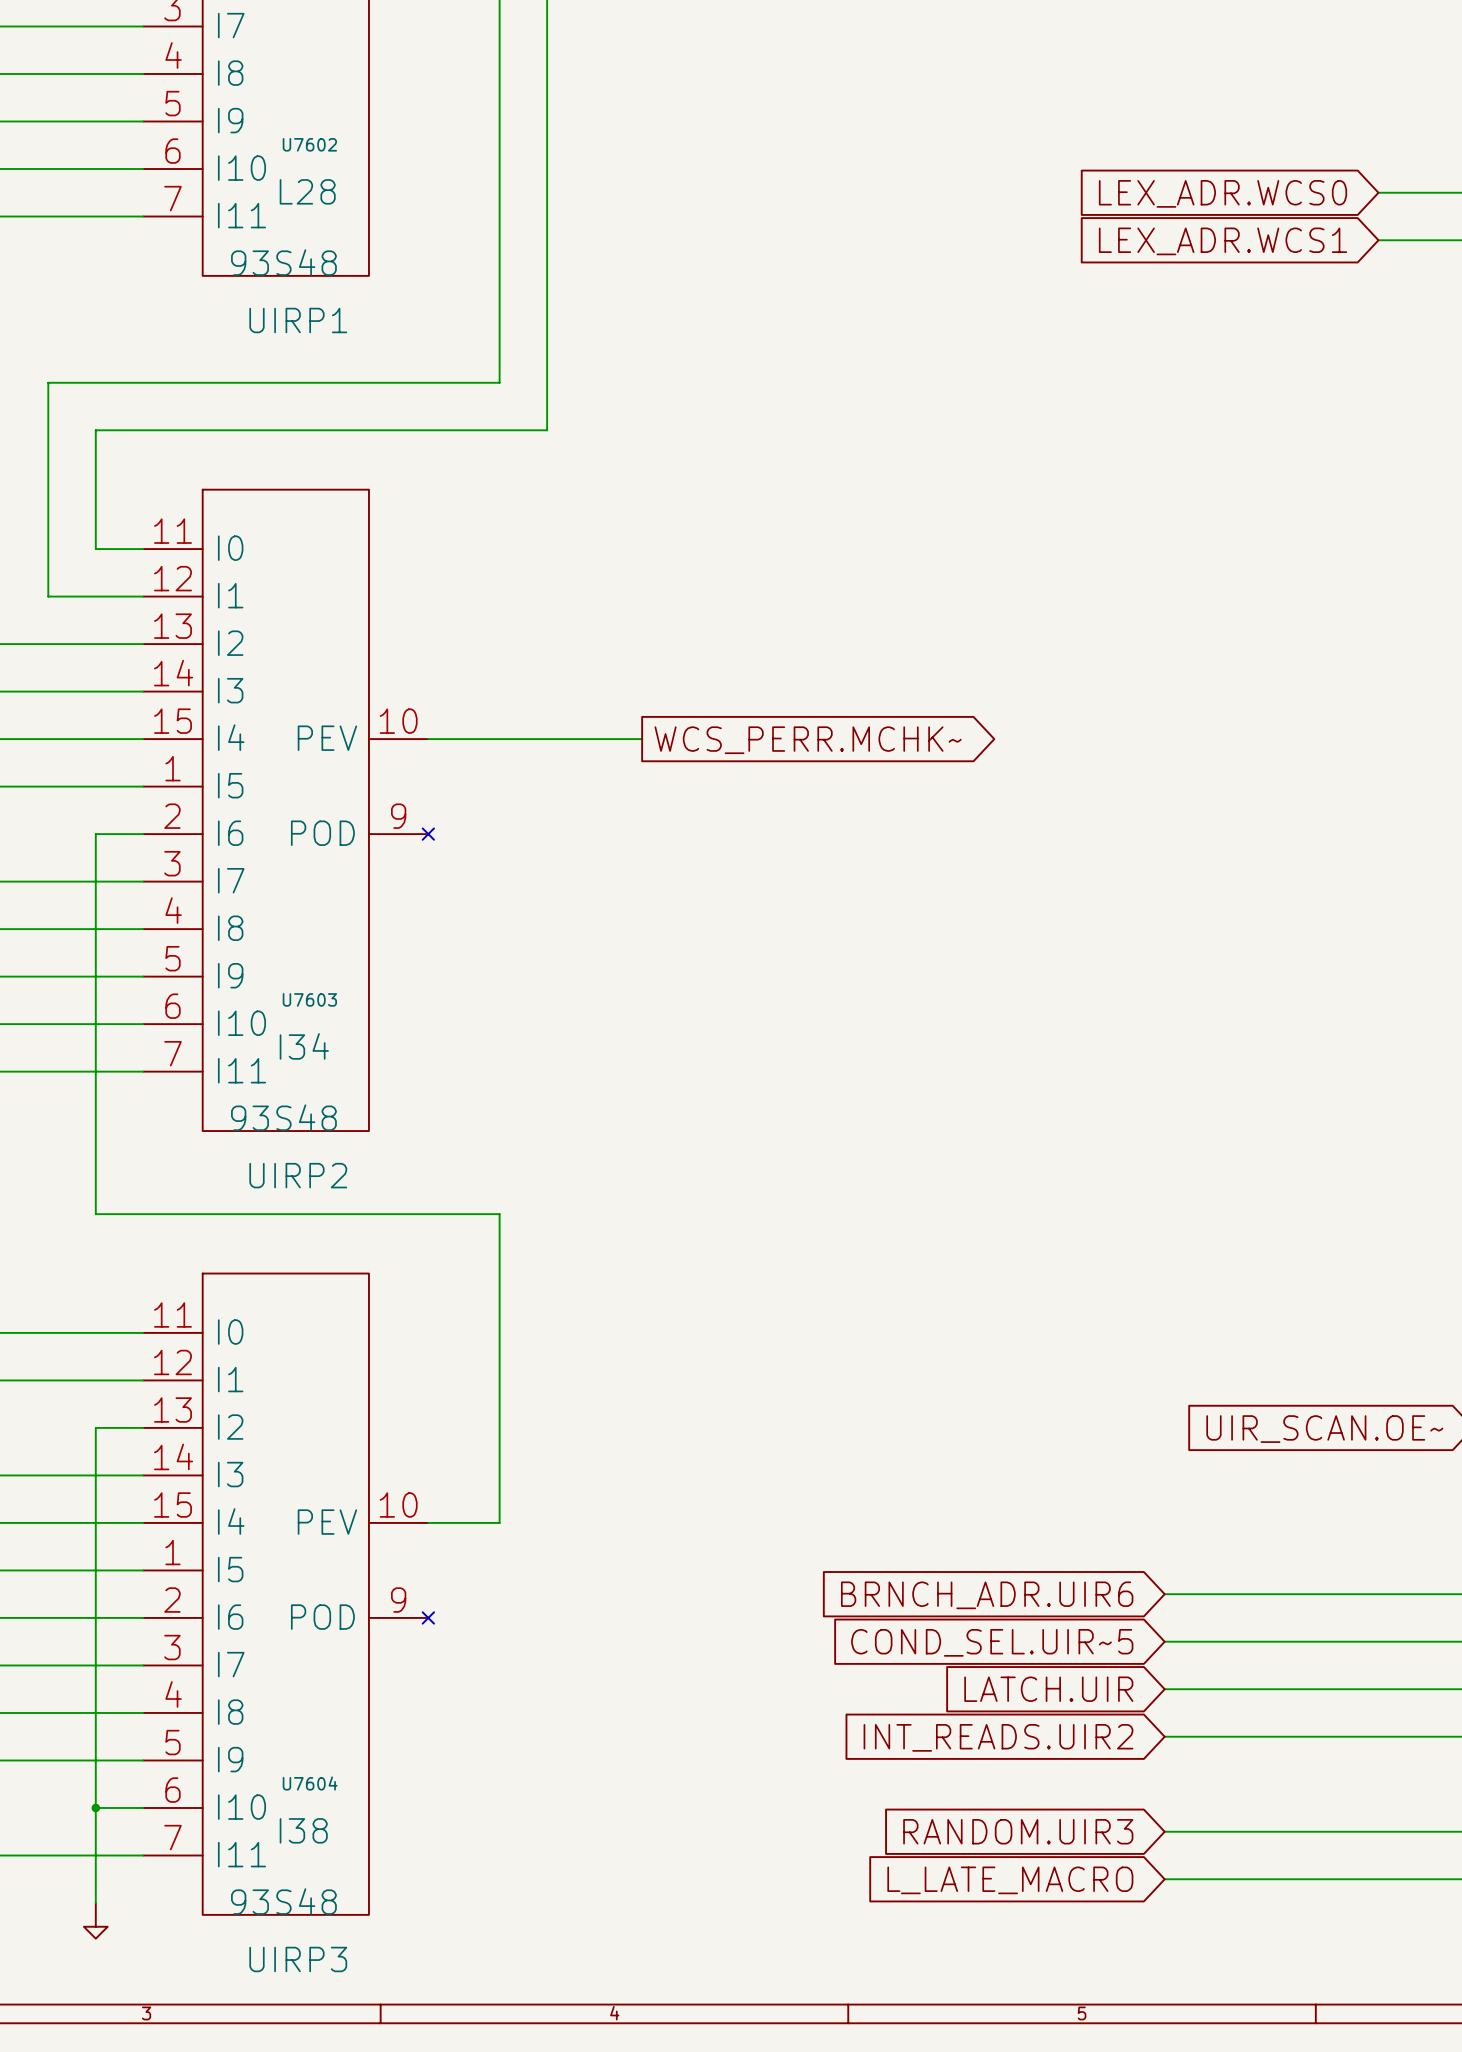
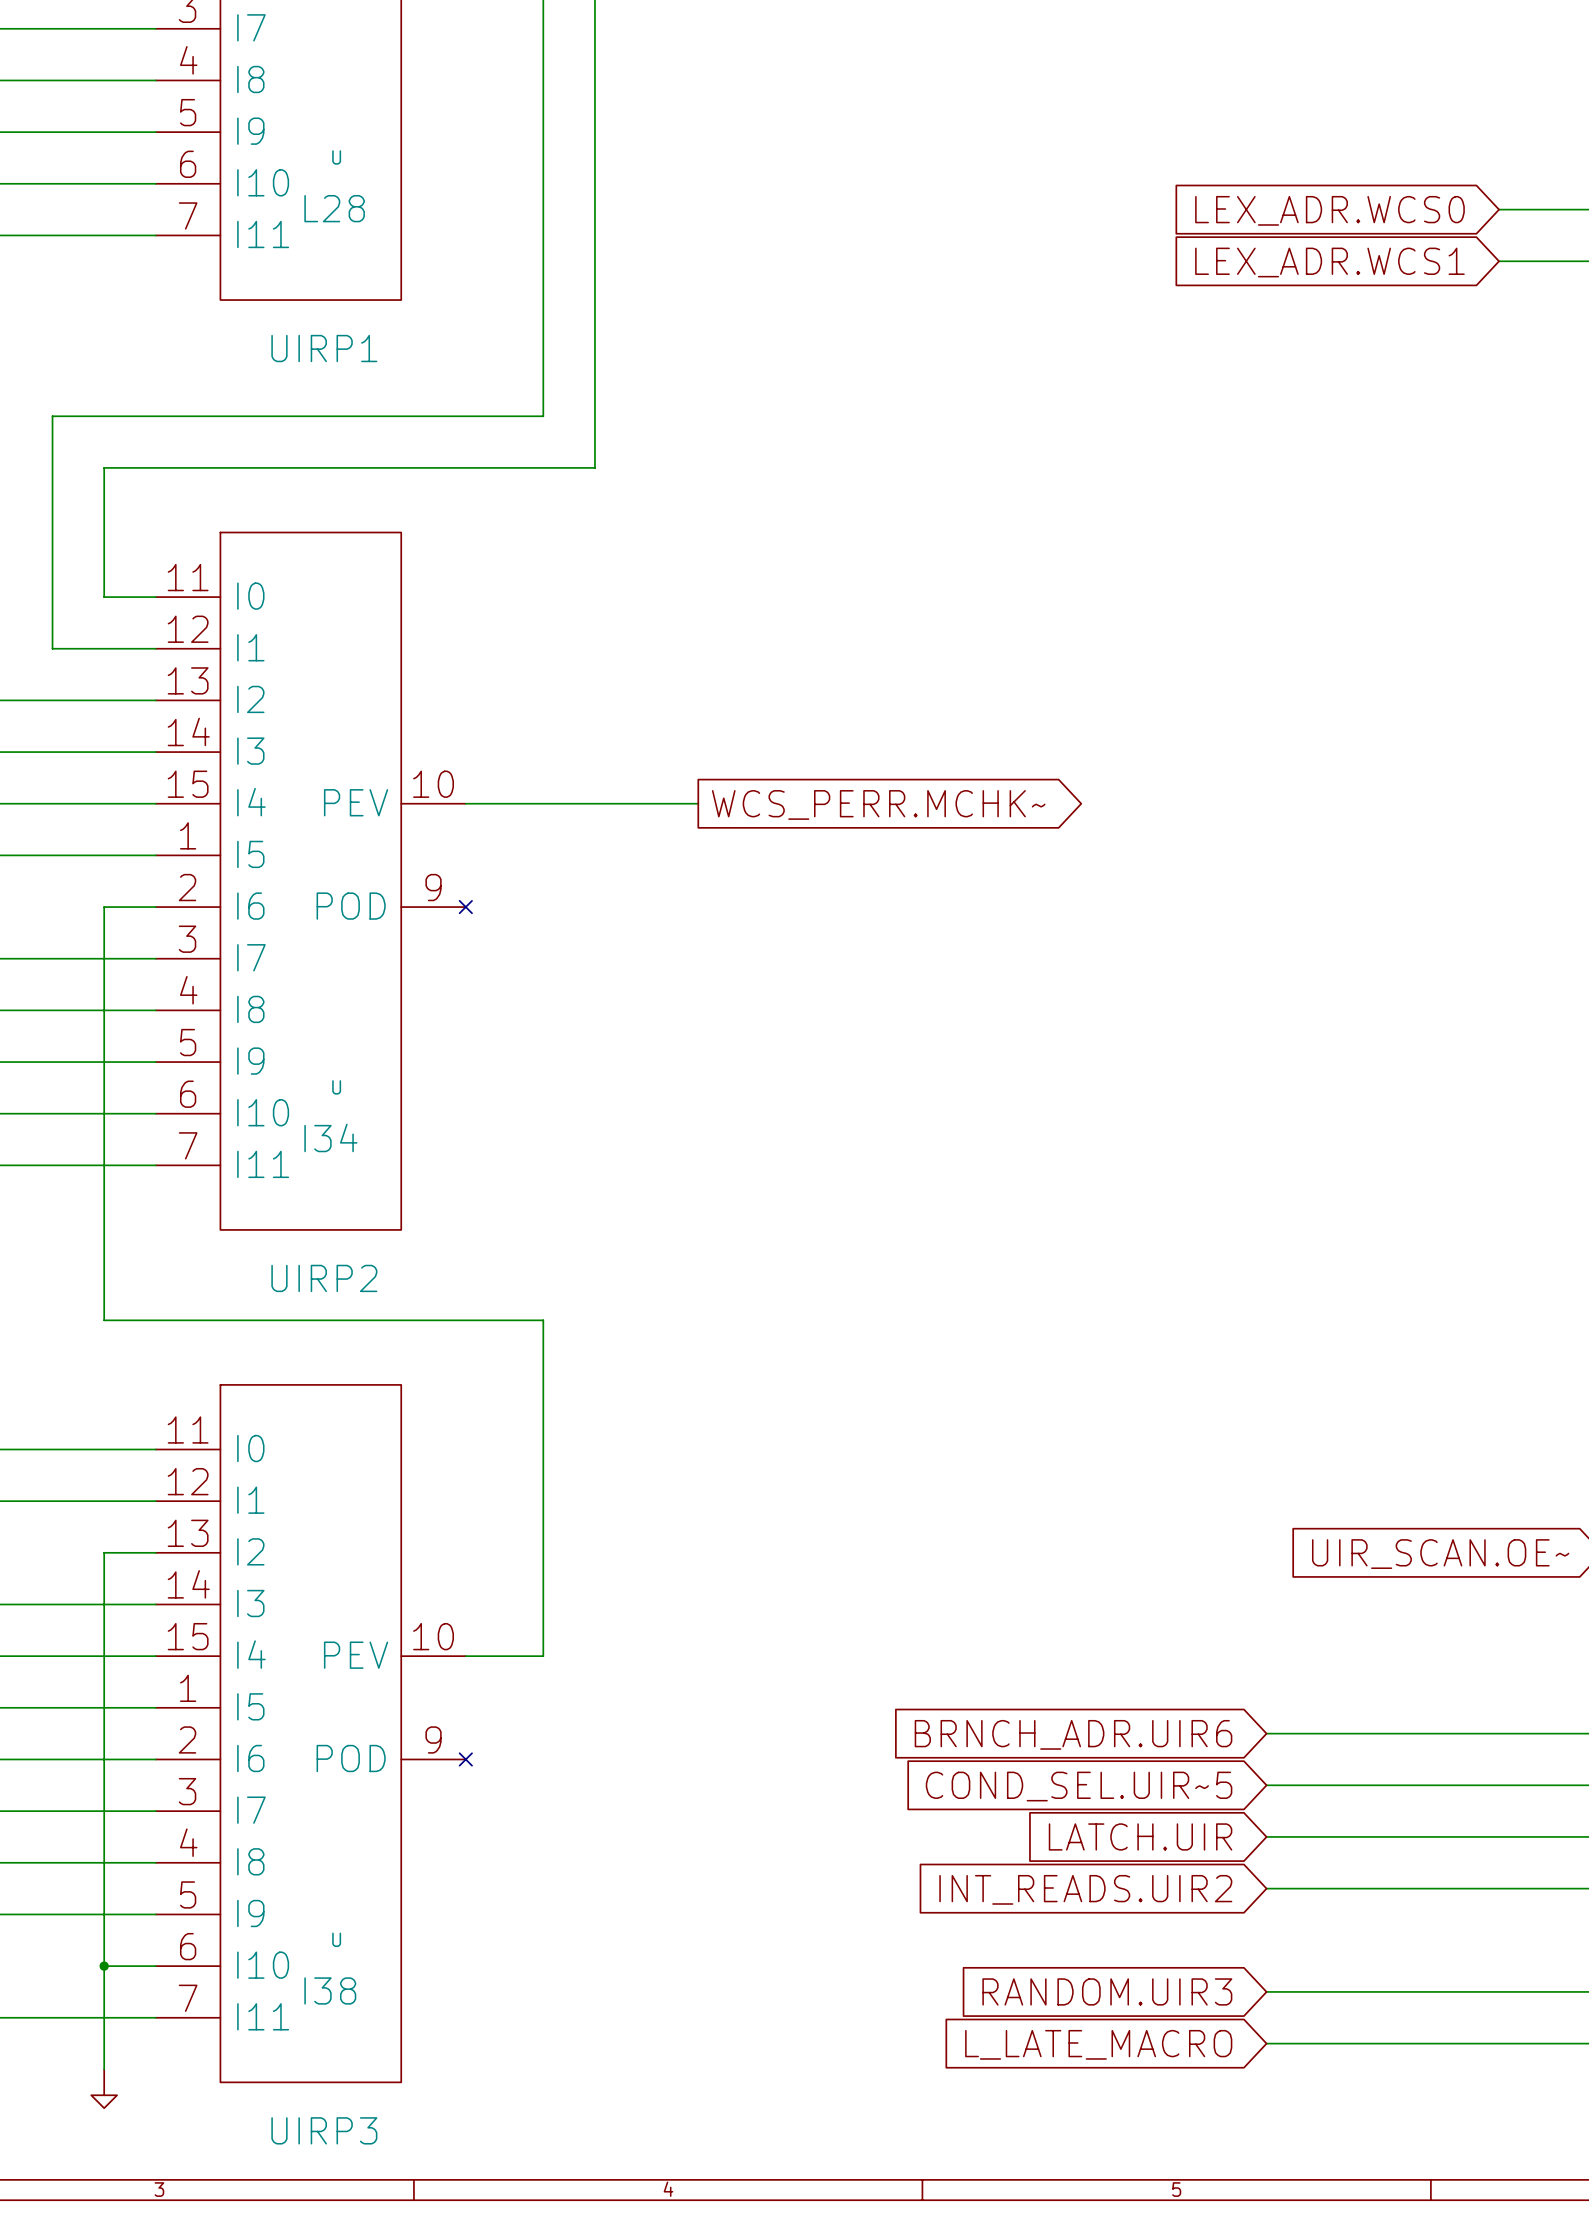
U7602 name: U7602 (309, 144) -> U (336, 157)
U7602 value: 93S48 (283, 262) -> none
U7603 name: U7603 (309, 999) -> U (336, 1087)
U7603 value: 93S48 (283, 1117) -> none
U7604 name: U7604 (310, 1783) -> U (336, 1939)
U7604 value: 93S48 (283, 1901) -> none

